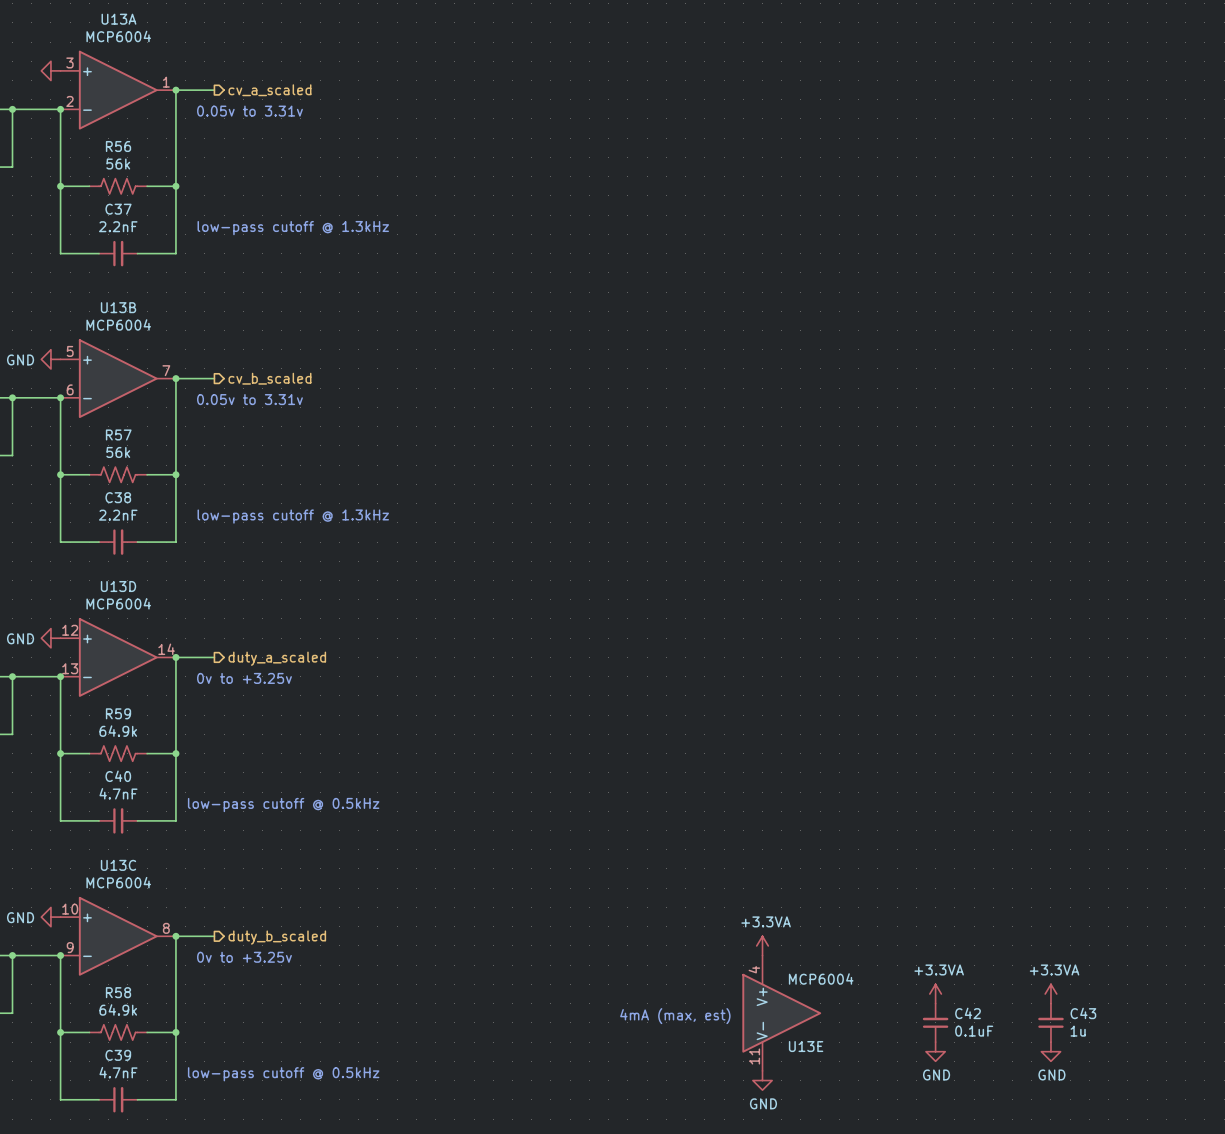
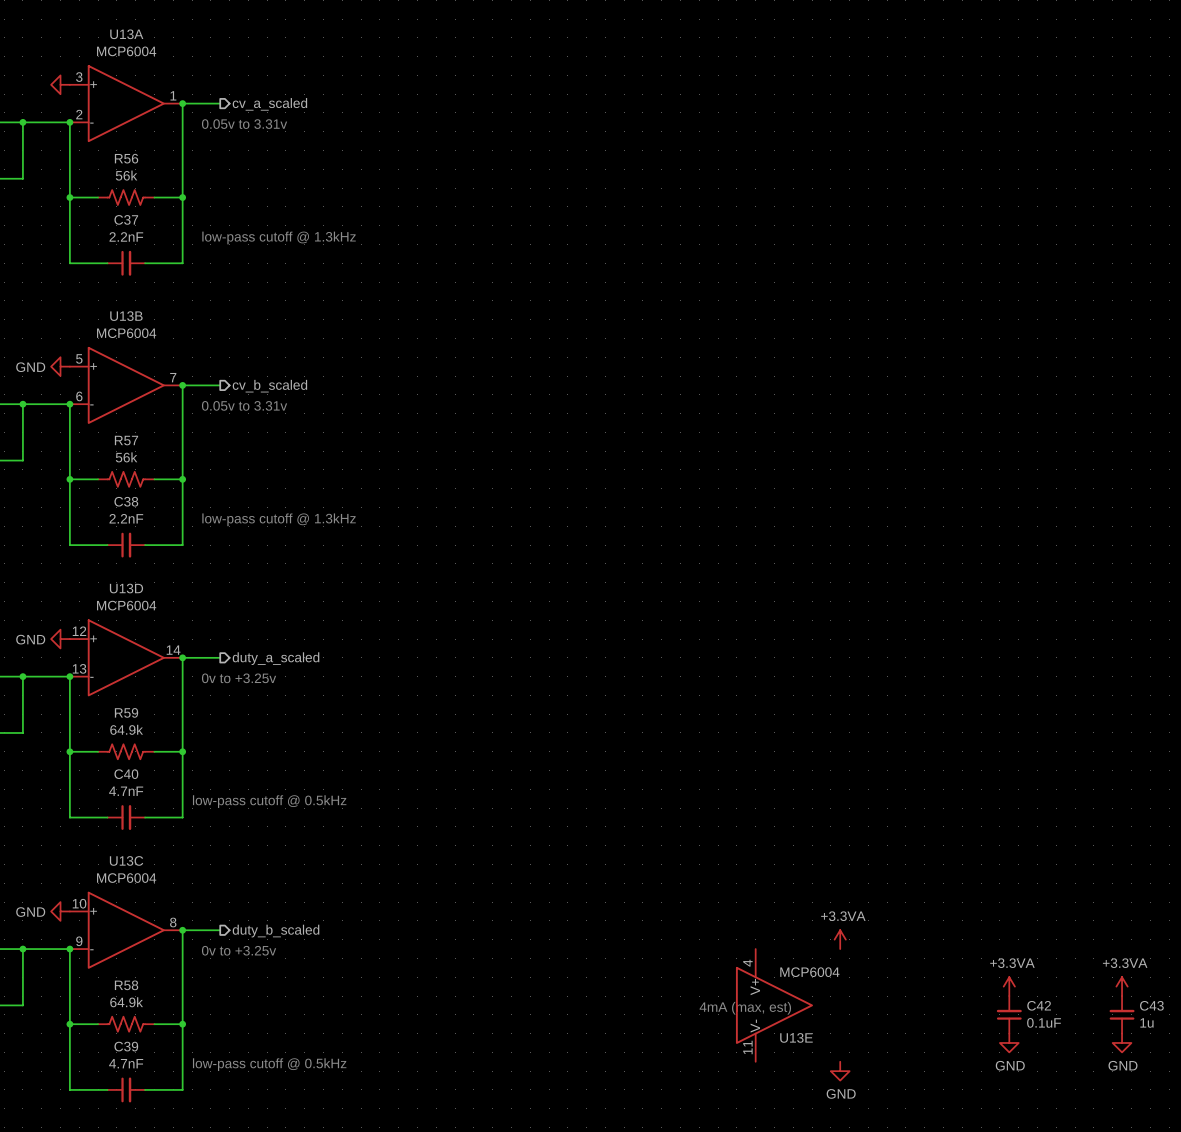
power symbol: +3.3VA (762, 945) -> none
power symbol: none -> +3.3VA (840, 939)
power symbol: +3.3VA (935, 993) -> none
power symbol position: +3.3VA (1050, 993) -> +3.3VA (1009, 986)
power symbol: none -> +3.3VA (1122, 986)
text position: 4mA (max, est) (675, 1016) -> 4mA (max, est) (745, 1008)
C42 position: (935, 1022) -> (1009, 1014)
C43 position: (1050, 1022) -> (1122, 1014)
power symbol: GND (935, 1051) -> none
power symbol position: GND (1050, 1051) -> GND (1009, 1042)
power symbol: none -> GND (1122, 1042)
power symbol: GND (762, 1080) -> none
power symbol: none -> GND (840, 1071)

